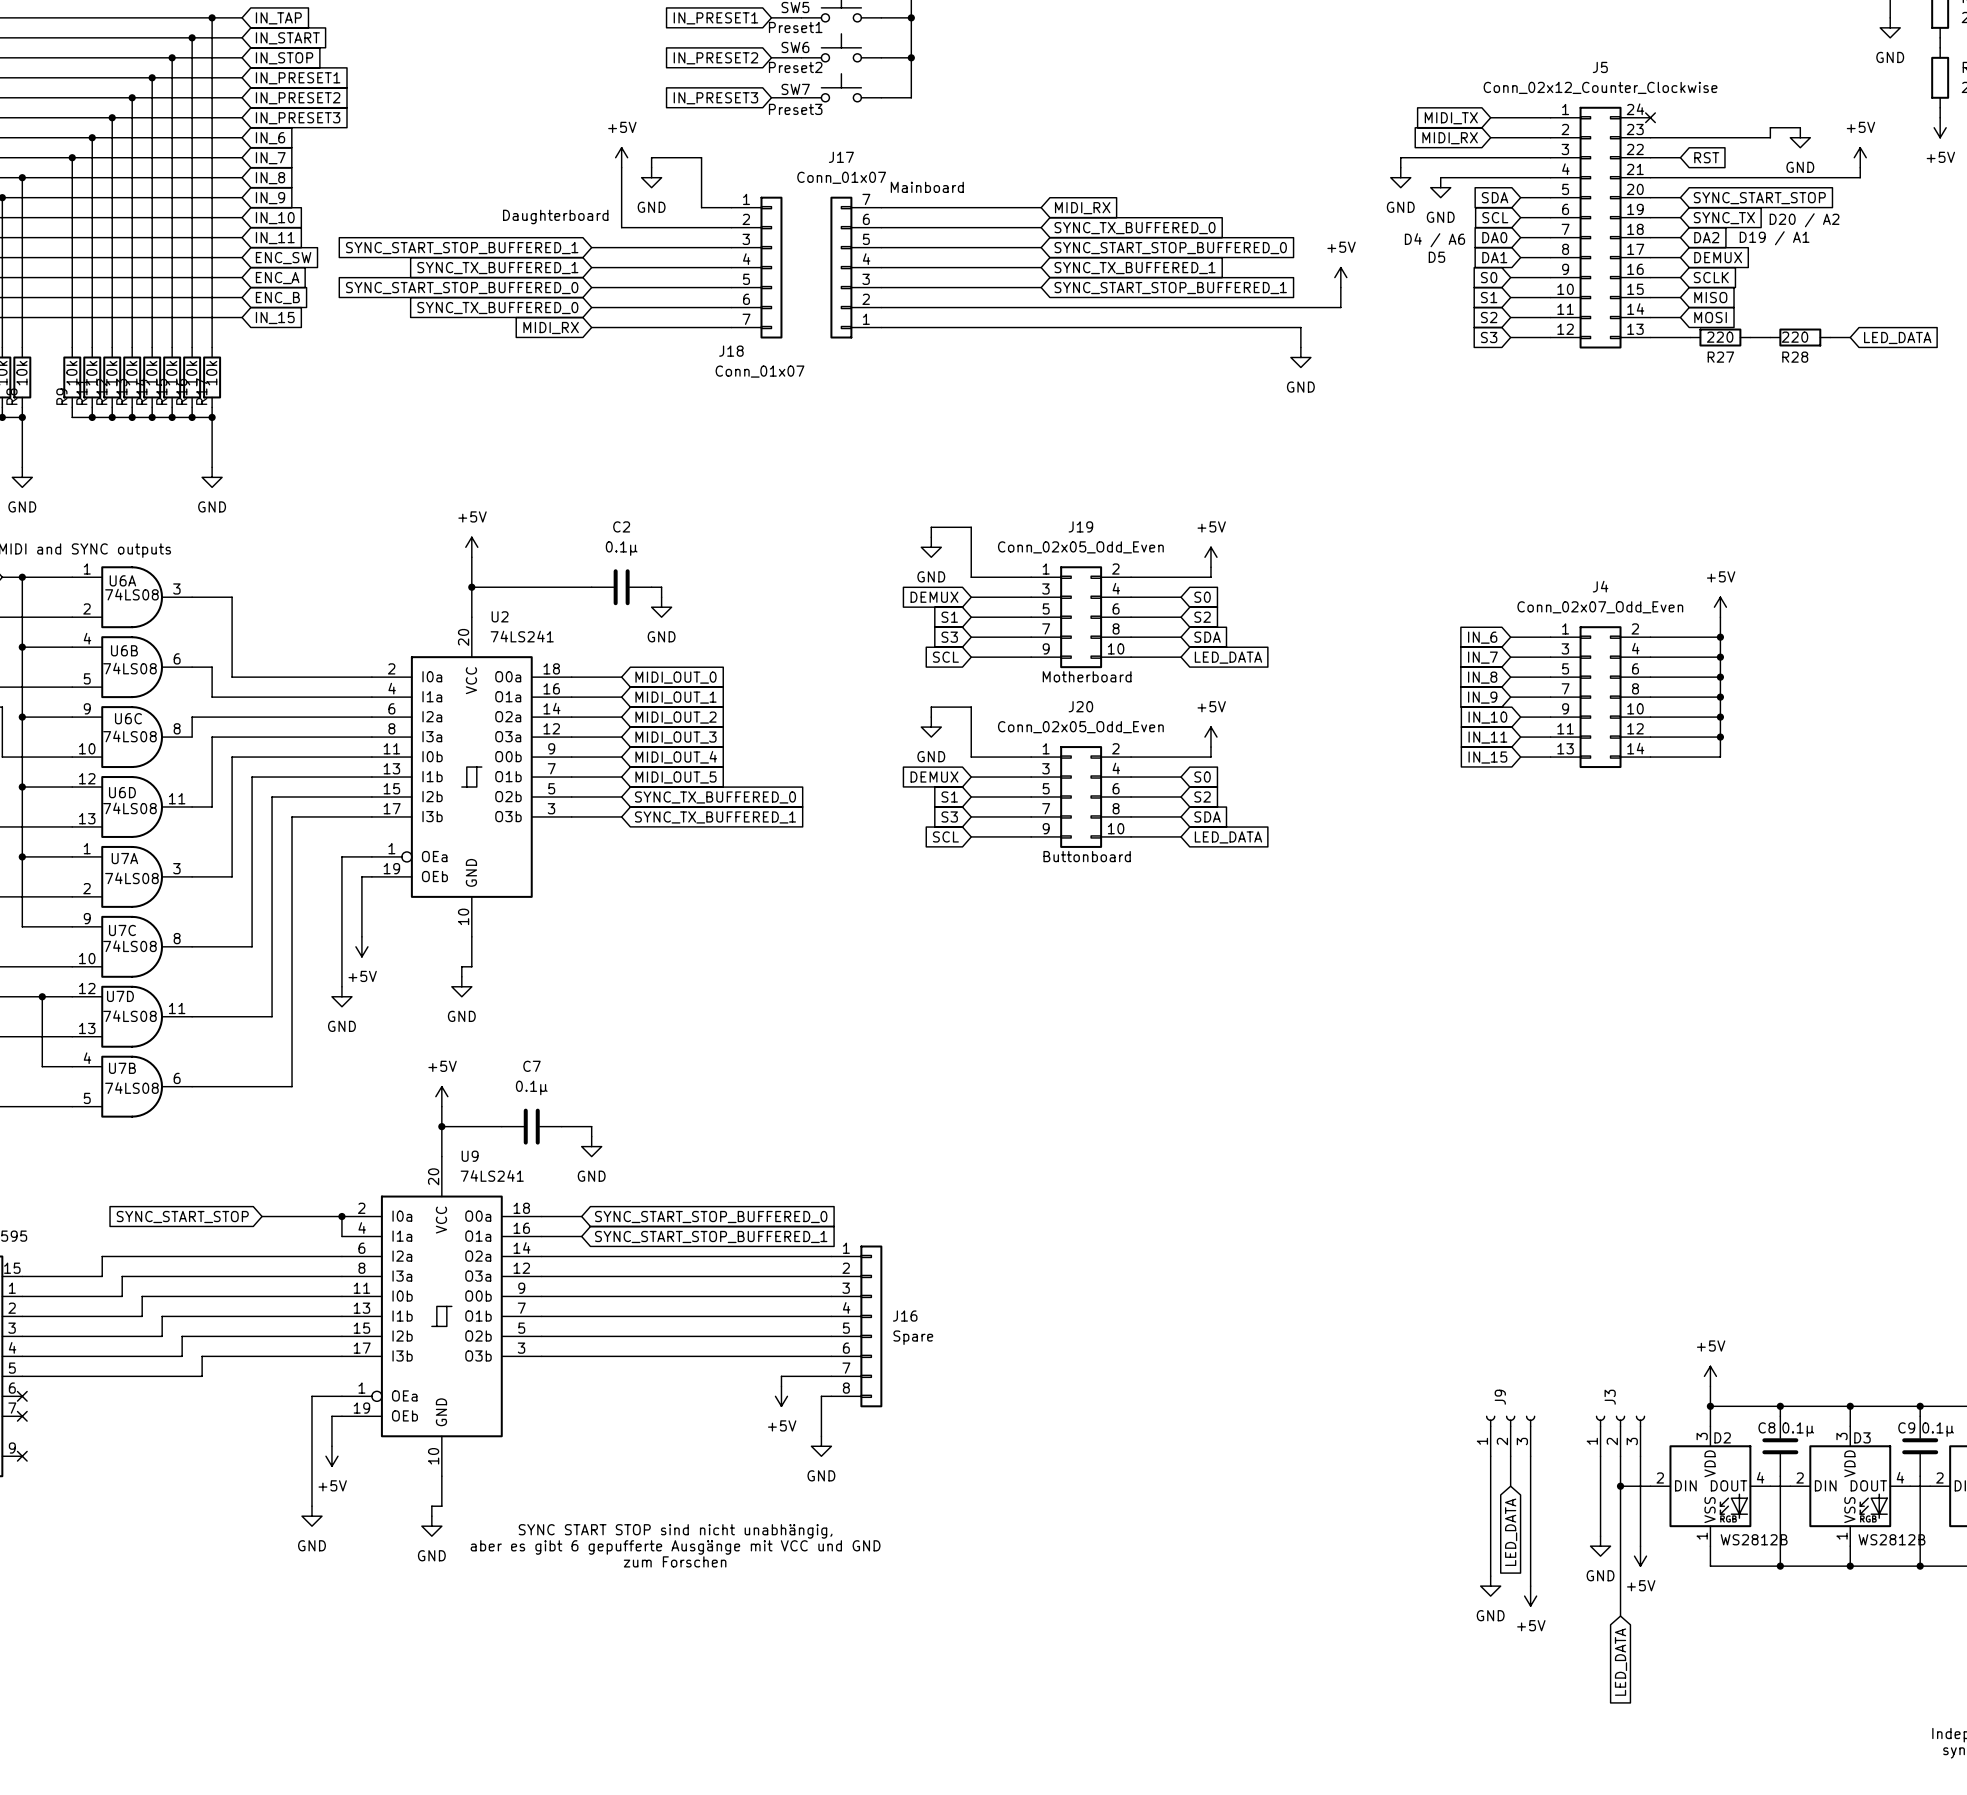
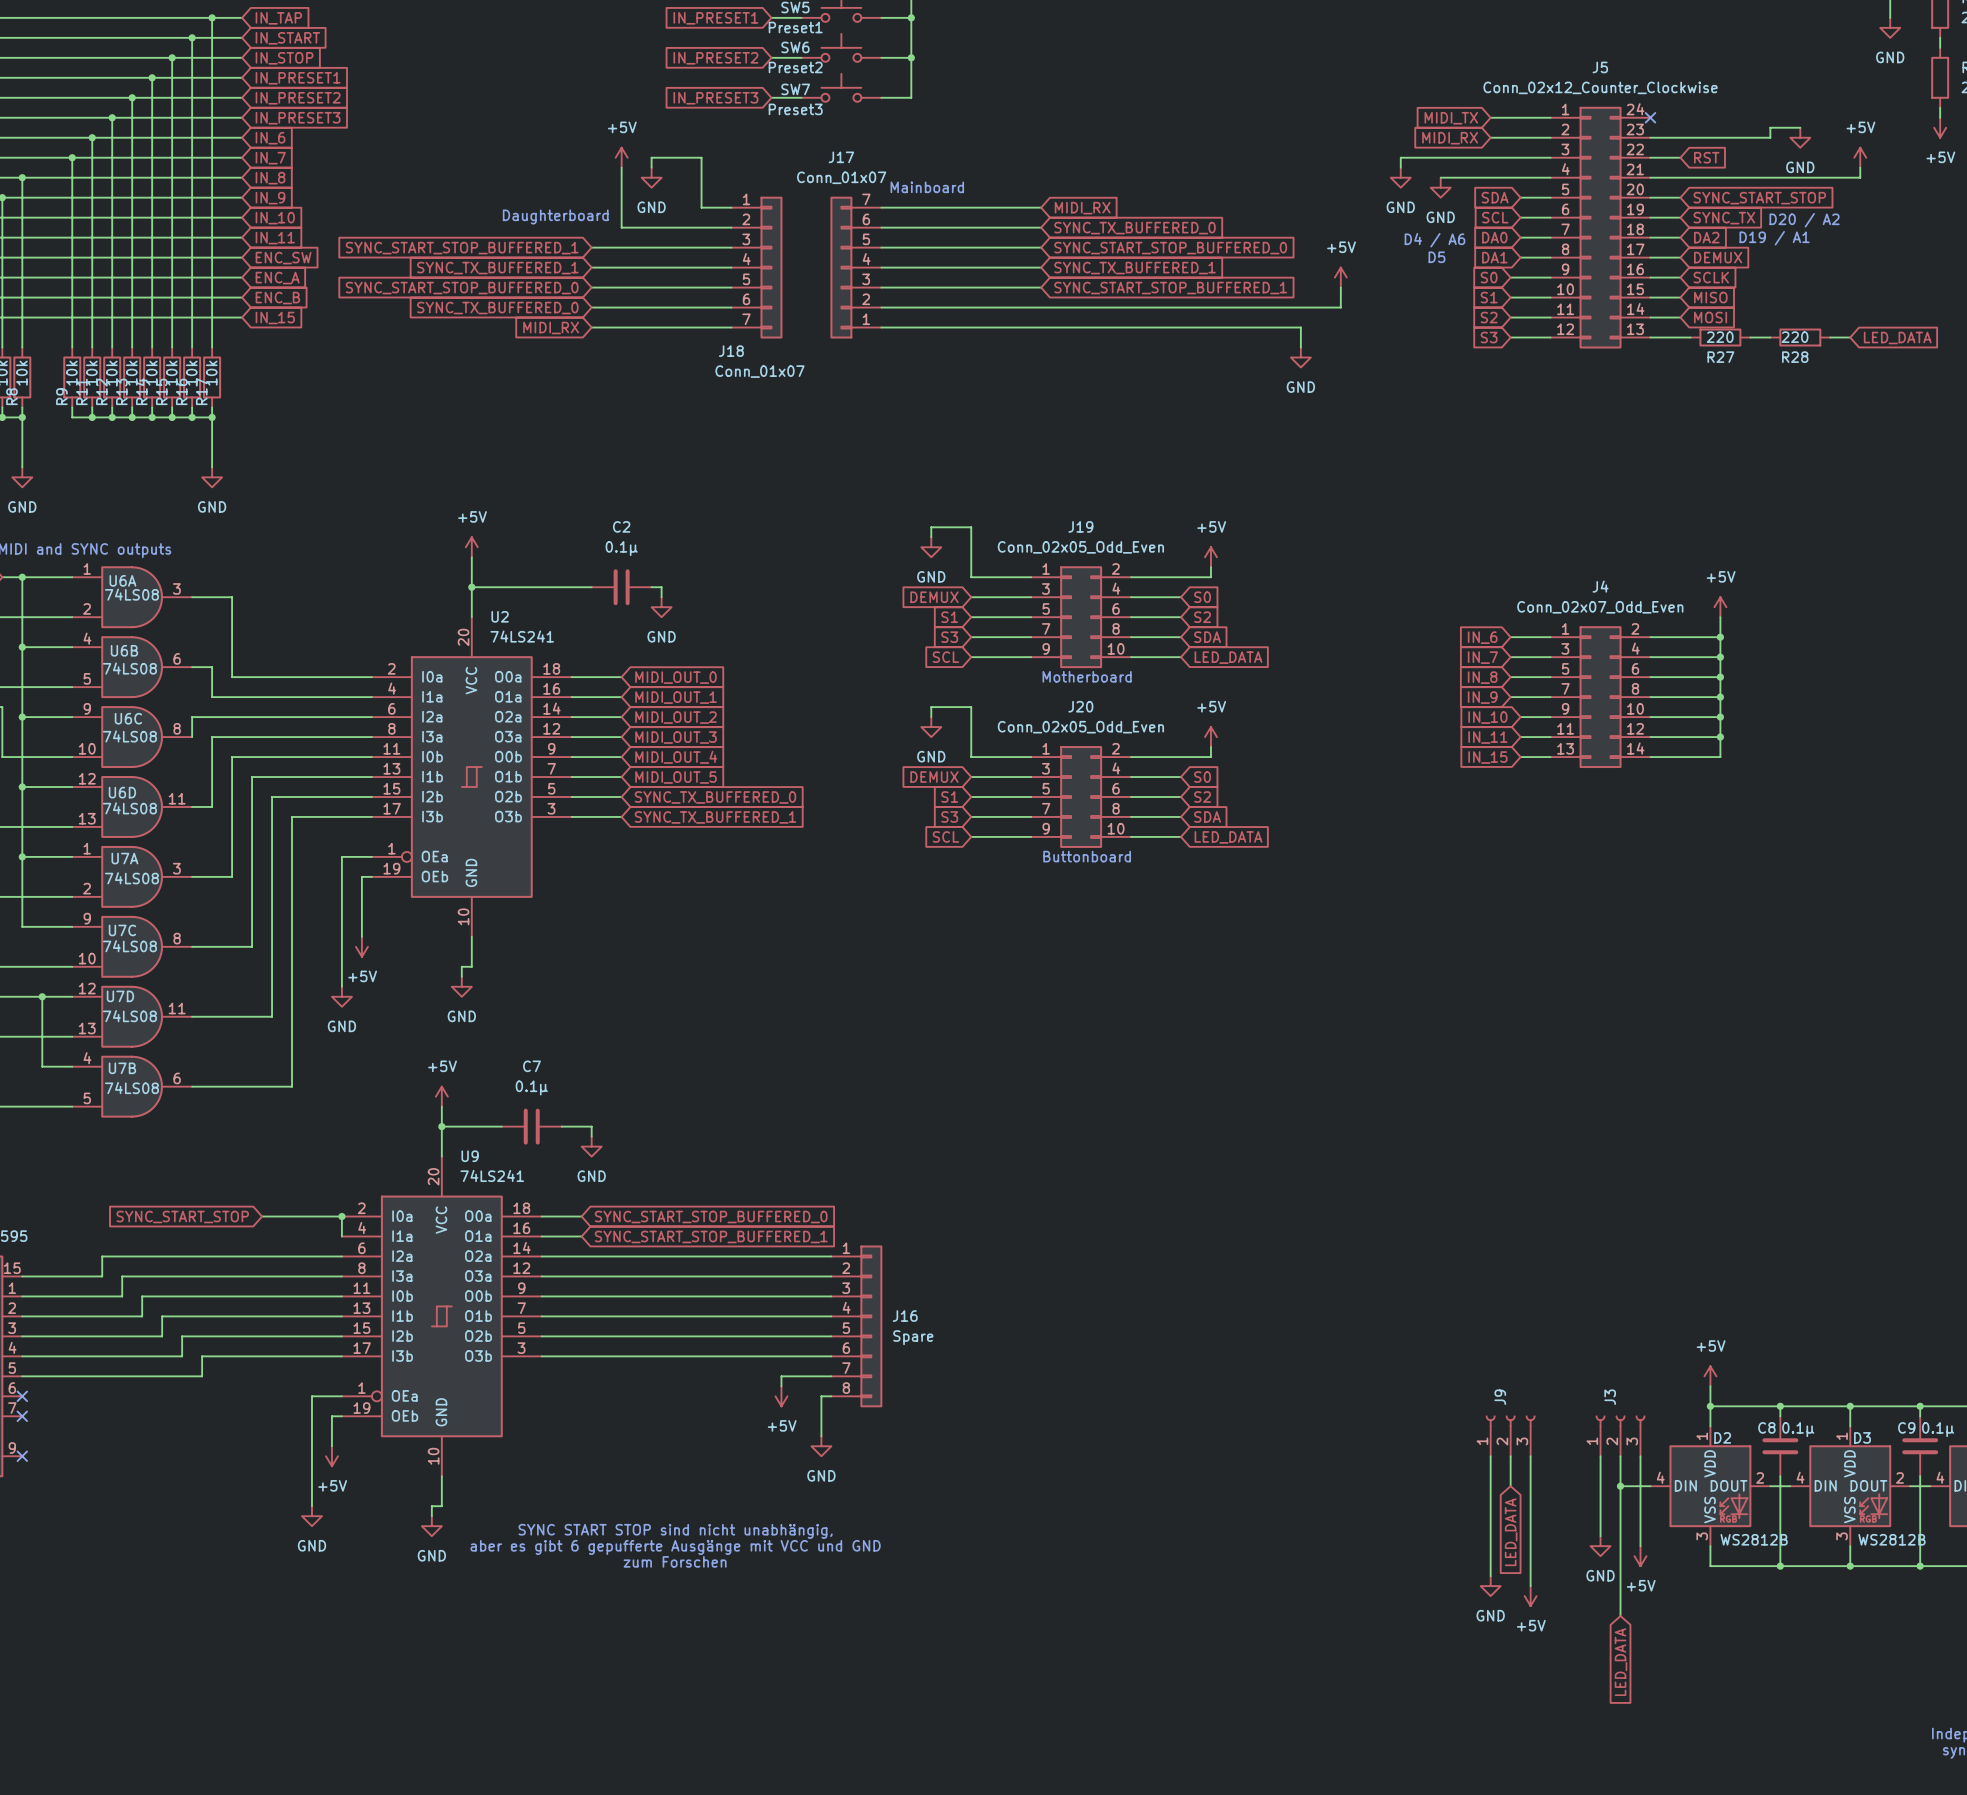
D2 pin number: 3 (1702, 1436) -> 1 (1702, 1436)
D3 pin number: 3 (1842, 1436) -> 1 (1842, 1436)
D2 pin number: 2 (1660, 1477) -> 4 (1660, 1477)
D2 pin number: 4 (1760, 1477) -> 2 (1760, 1477)
D3 pin number: 2 (1800, 1477) -> 4 (1800, 1477)
D3 pin number: 4 (1900, 1477) -> 2 (1899, 1477)
part pin number: 2 (1939, 1477) -> 4 (1940, 1477)
D2 pin number: 1 (1702, 1536) -> 3 (1702, 1536)
D3 pin number: 1 (1842, 1536) -> 3 (1842, 1536)

